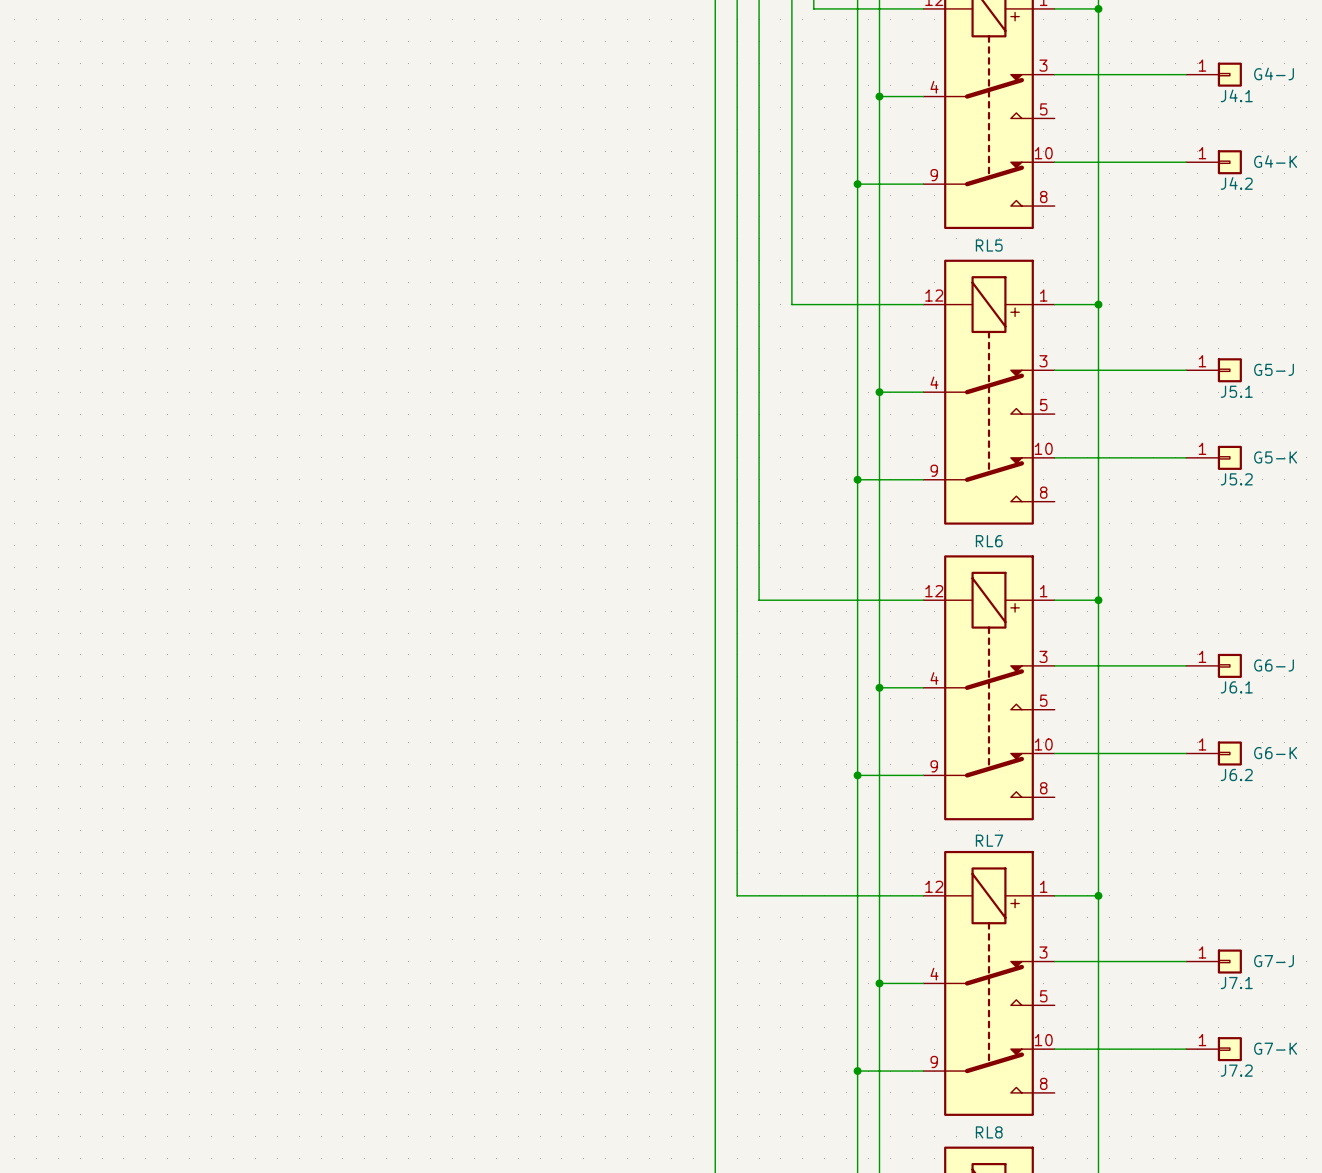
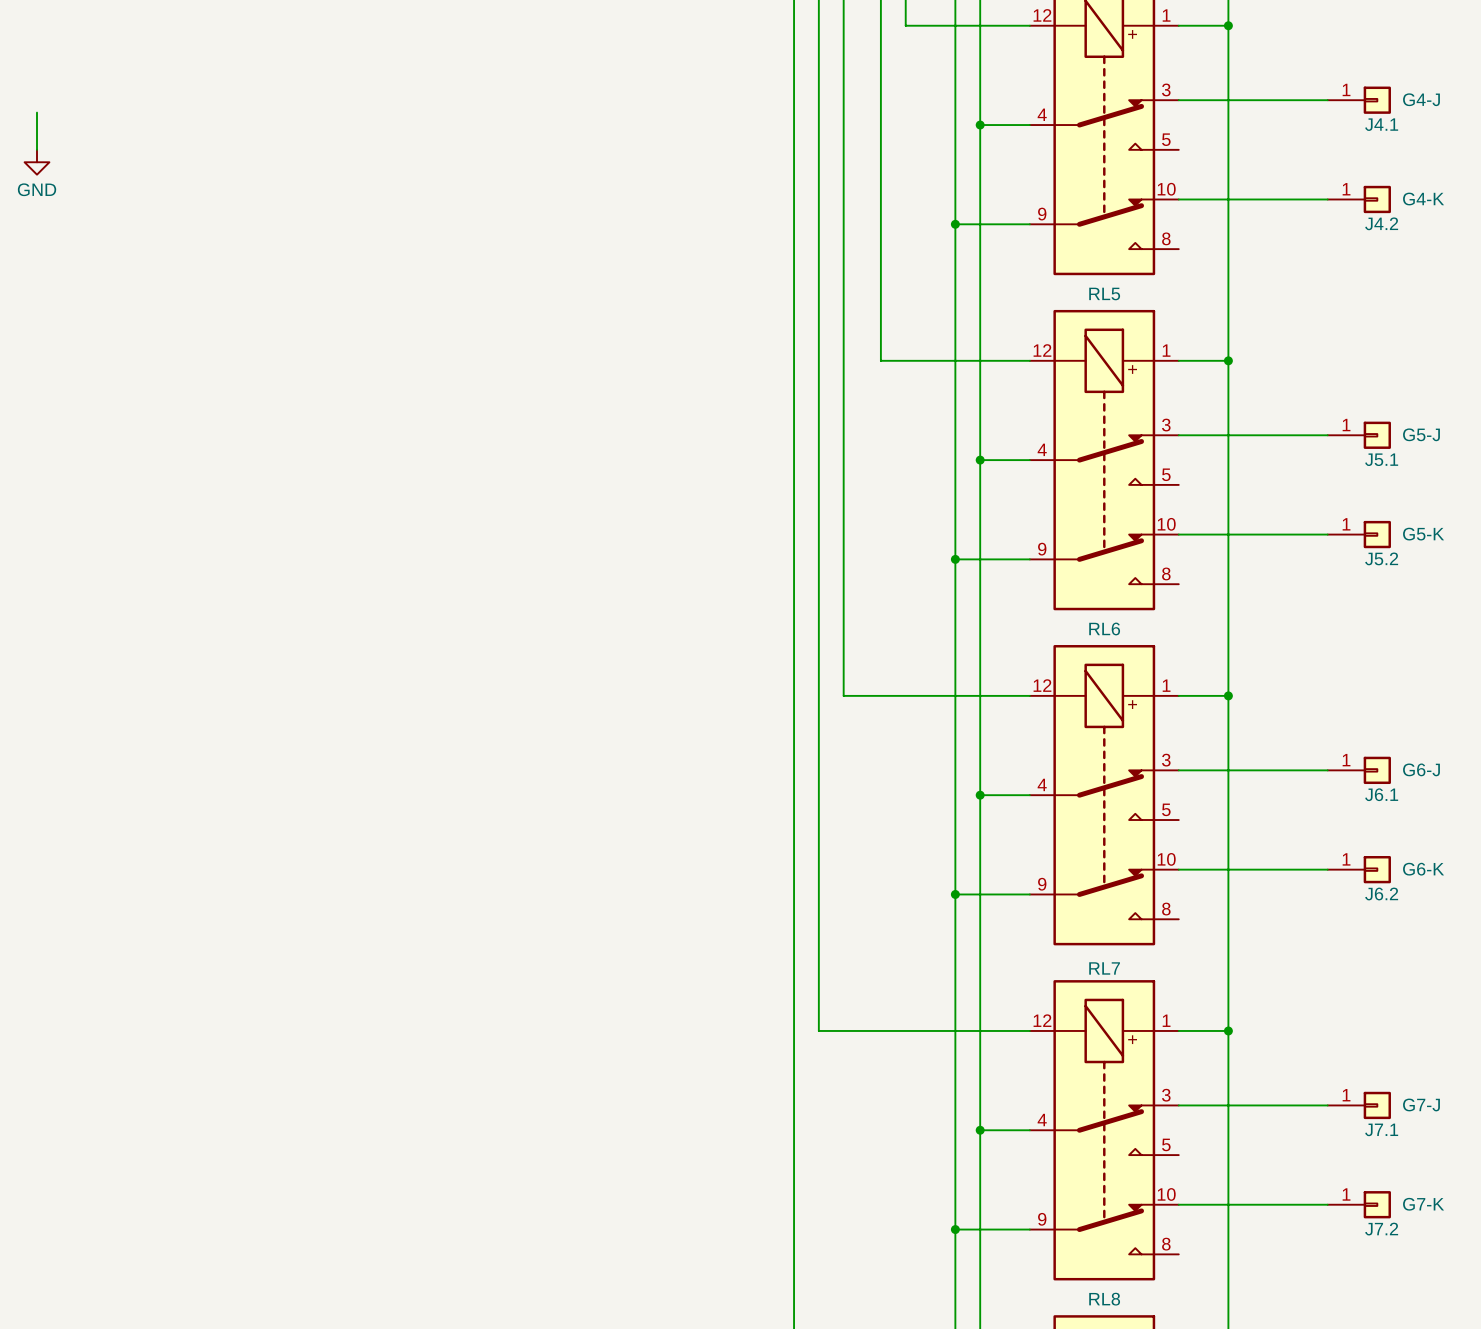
wire: none -> (37, 112) (37, 149)
power symbol: none -> GND (37, 162)

